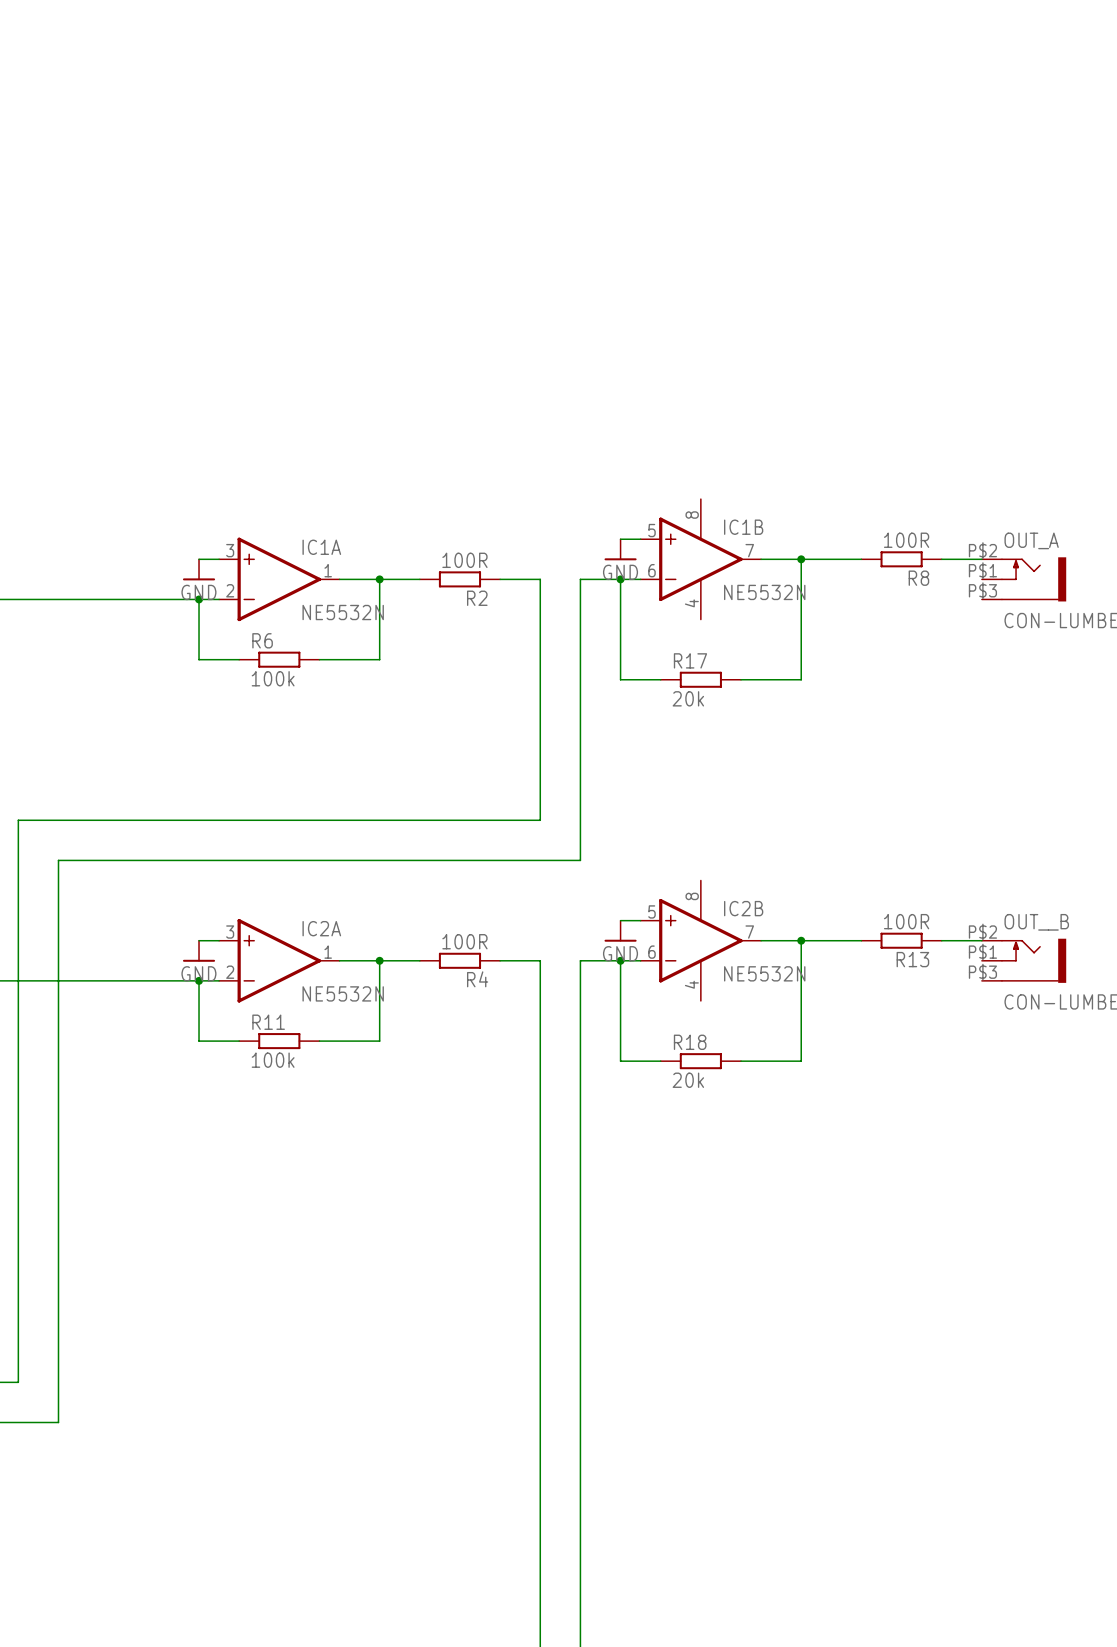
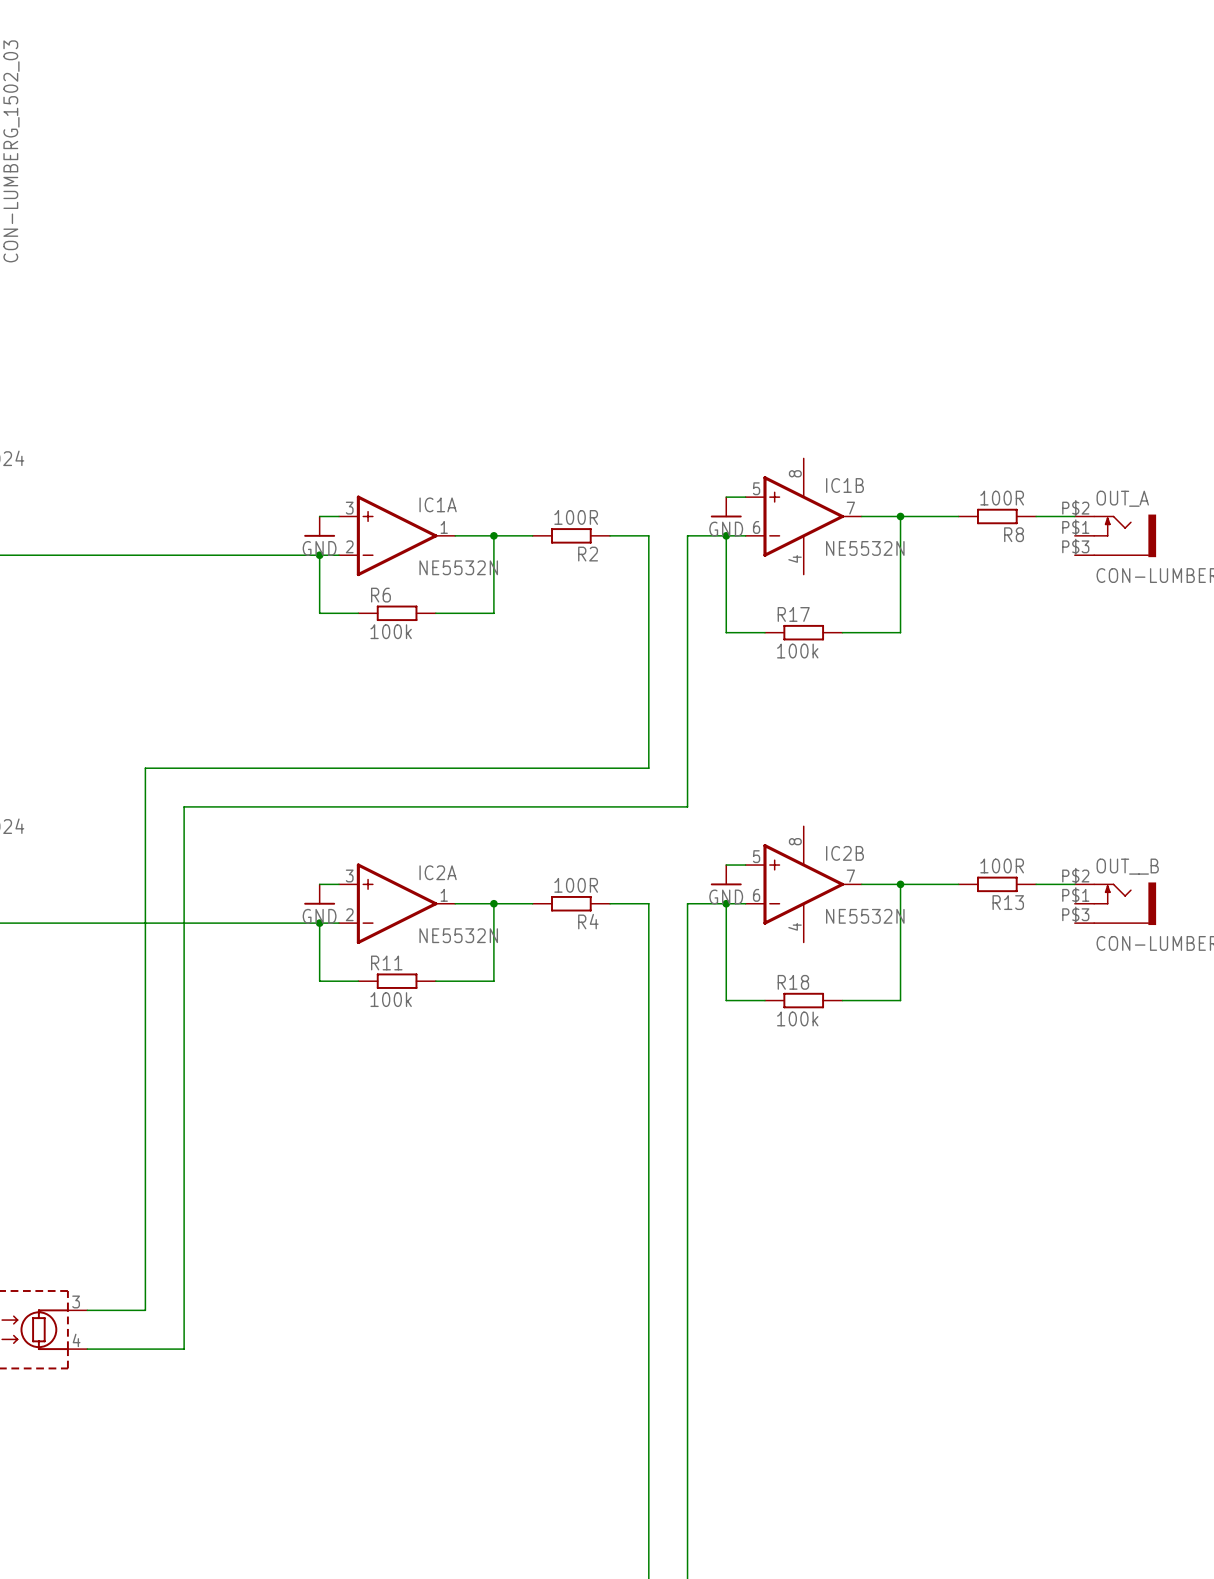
R17 value: 20k (688, 698) -> 100k (797, 651)
R18 value: 20k (688, 1080) -> 100k (797, 1018)

